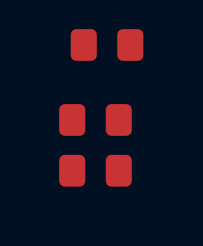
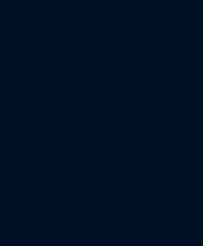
part: (107, 44) -> none
part: (95, 119) -> none
part: (95, 170) -> none

